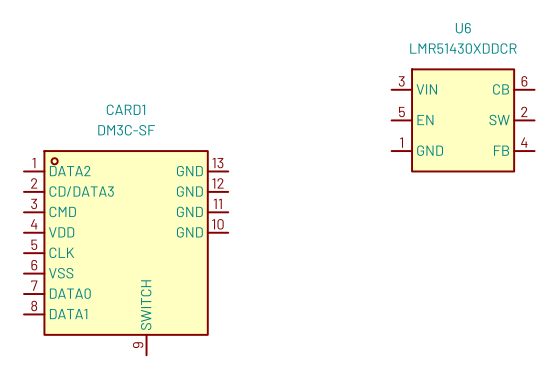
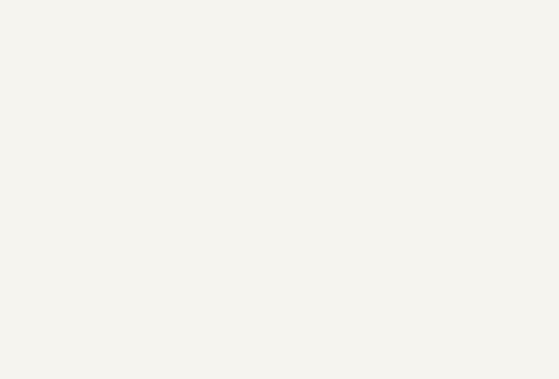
U6: LMR51430XDDCR (463, 120) -> none
CARD1: DM3C-SF (126, 253) -> none

